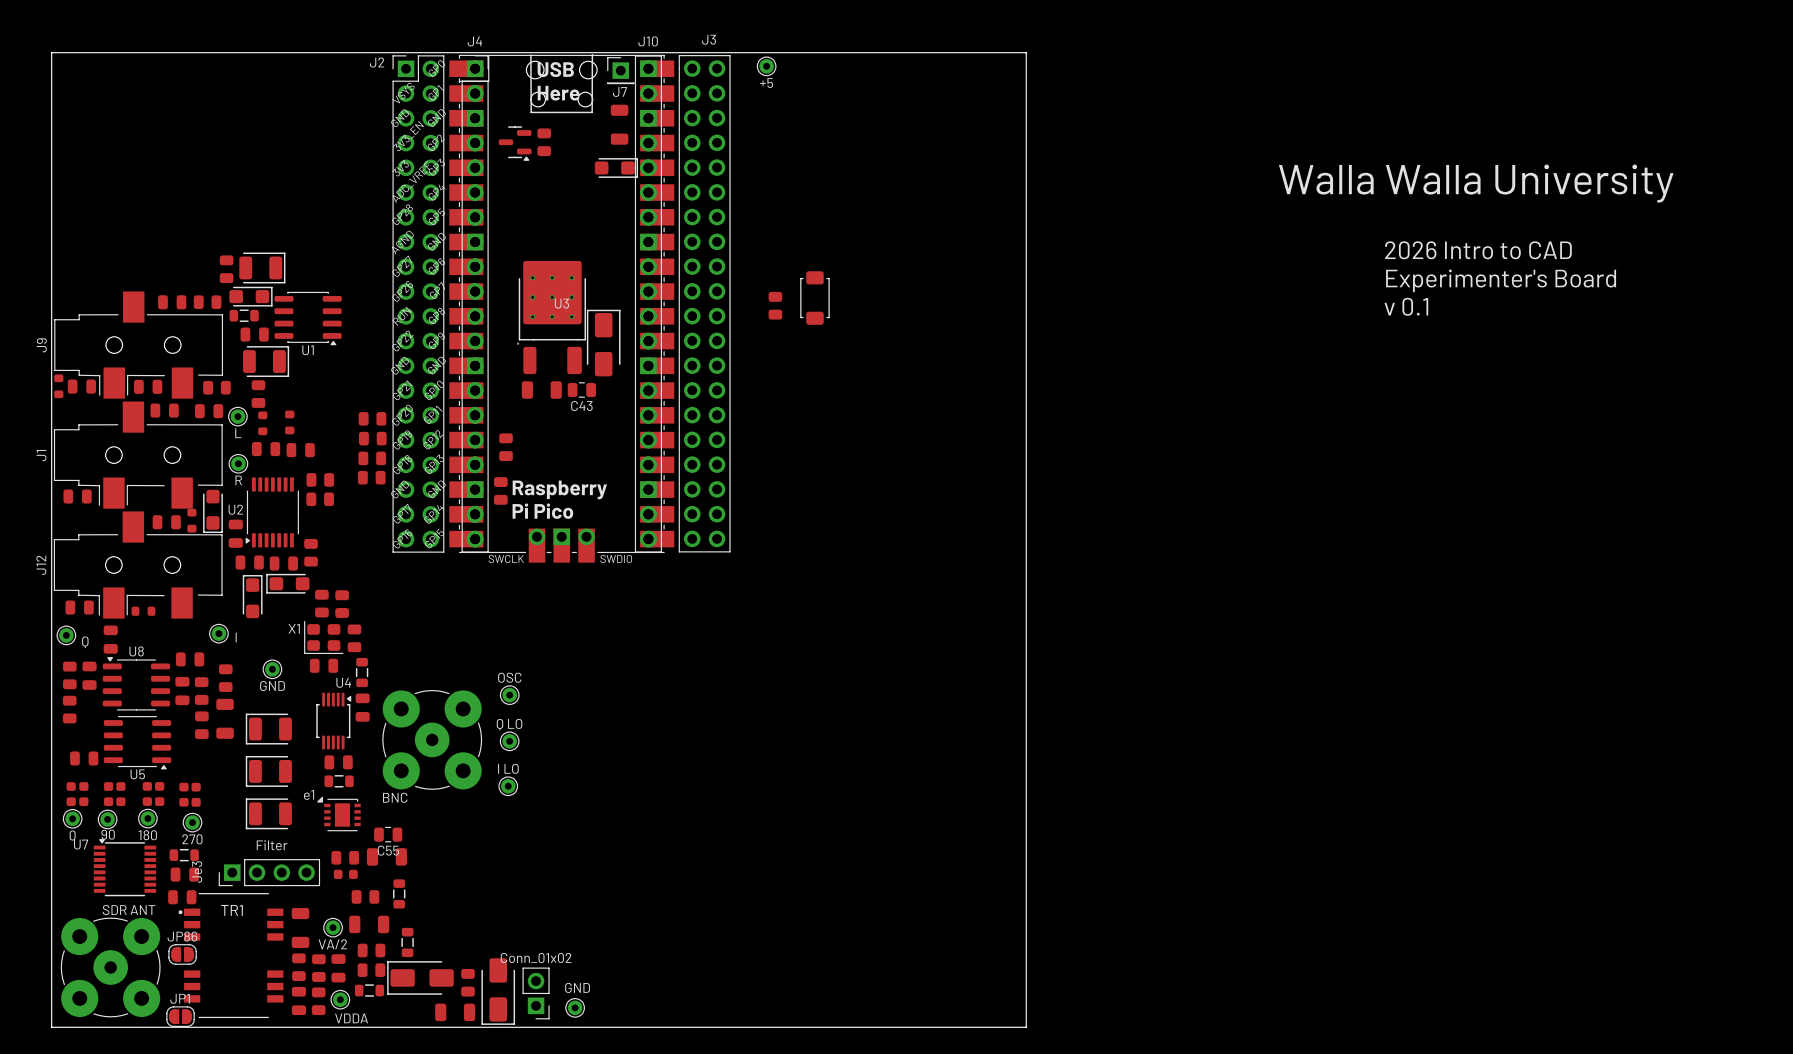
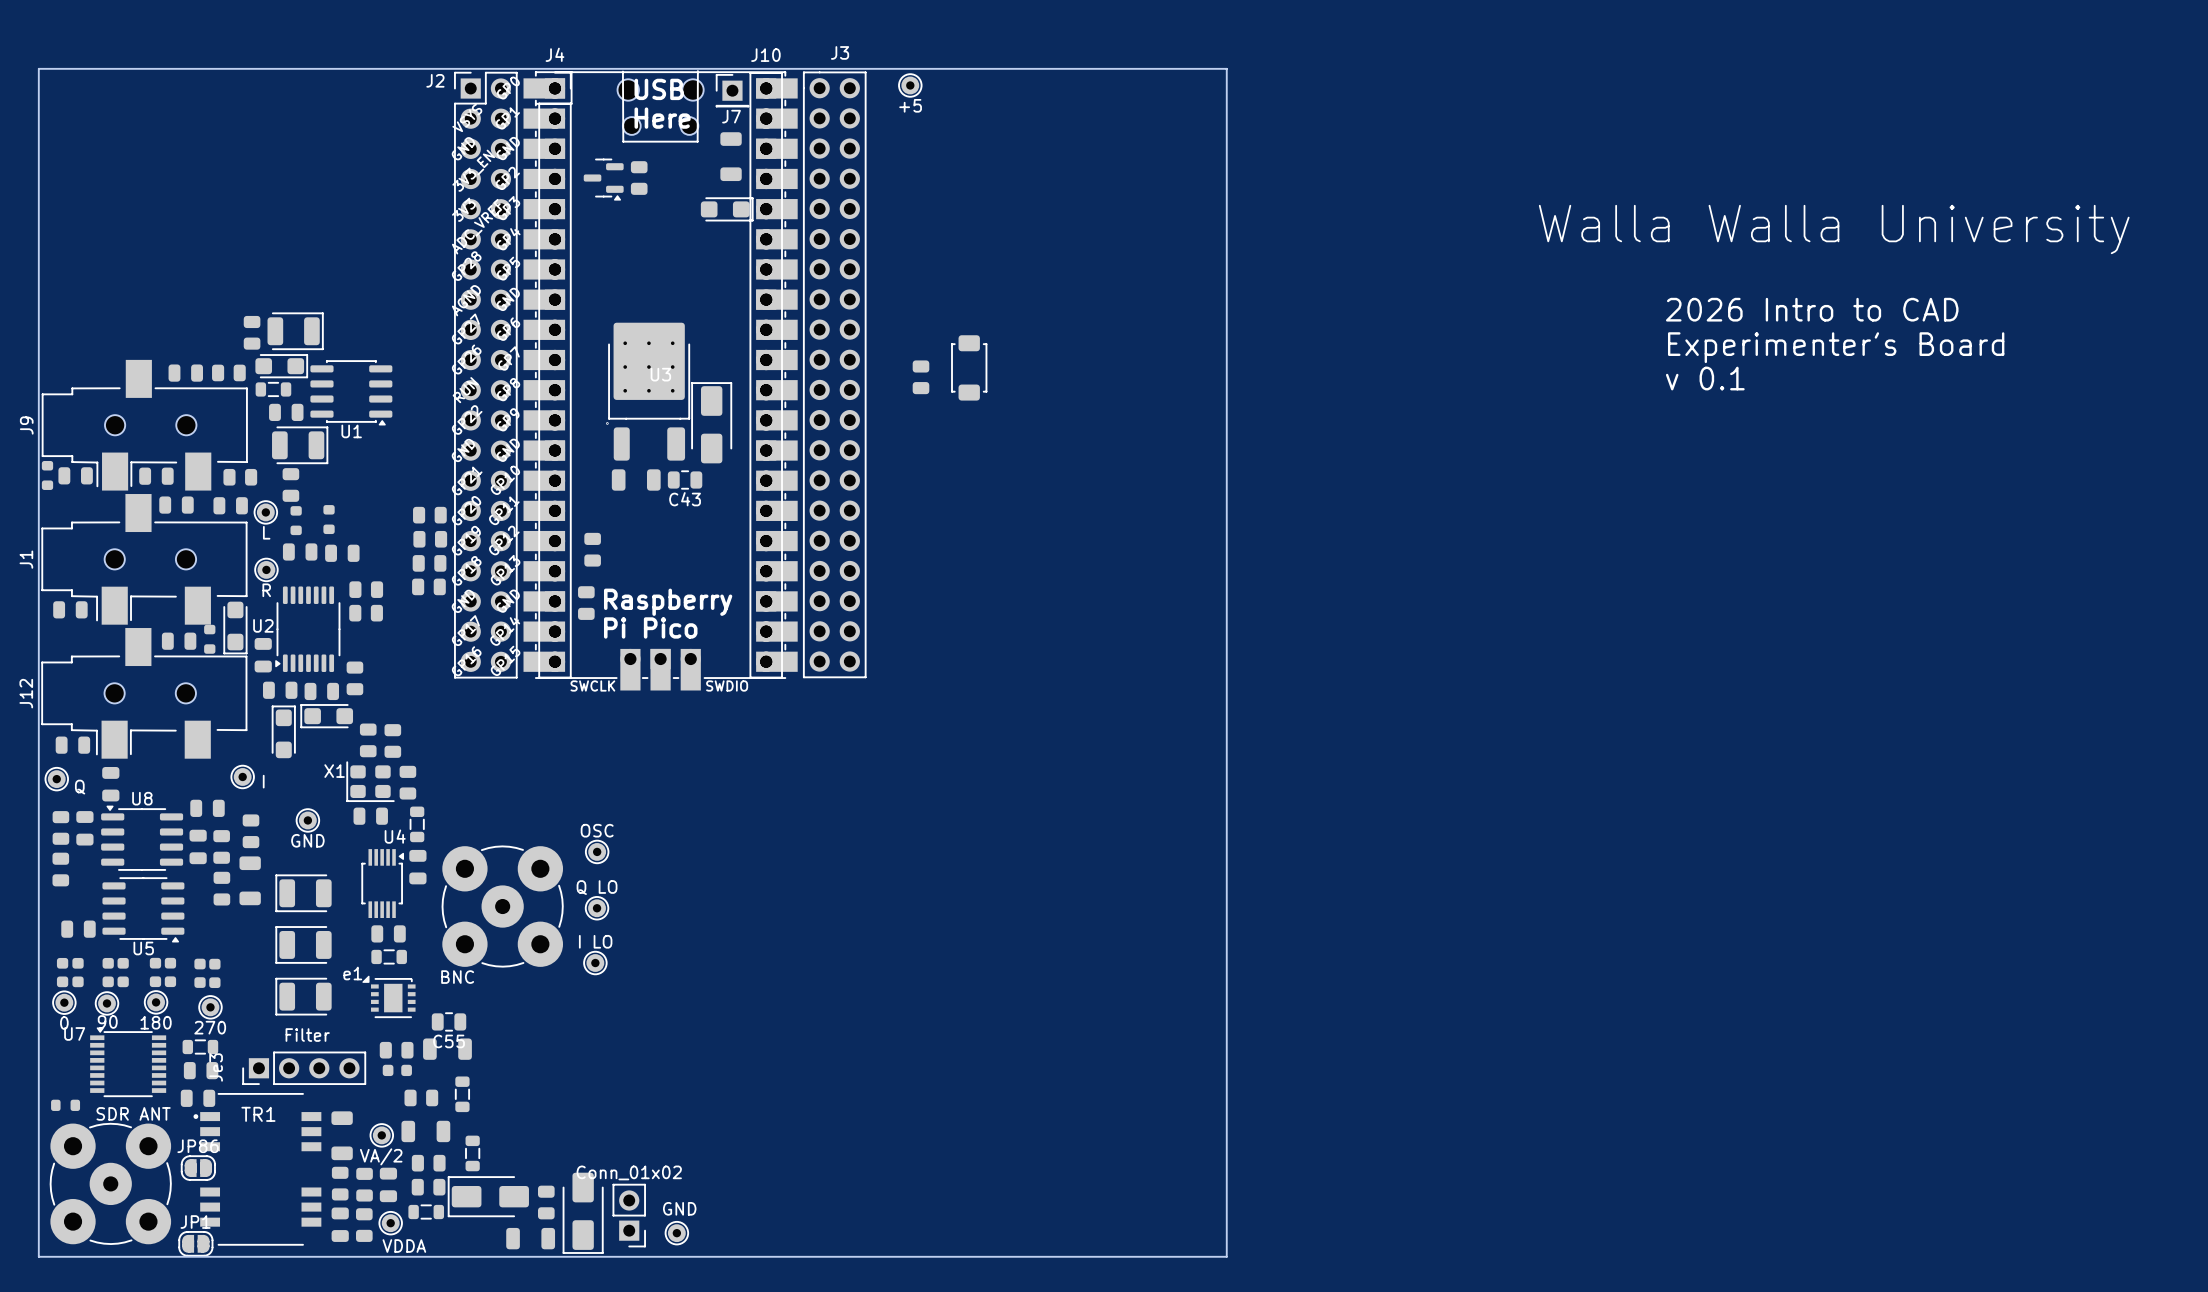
part: (143, 611) -> none
part: none -> (65, 1105)

